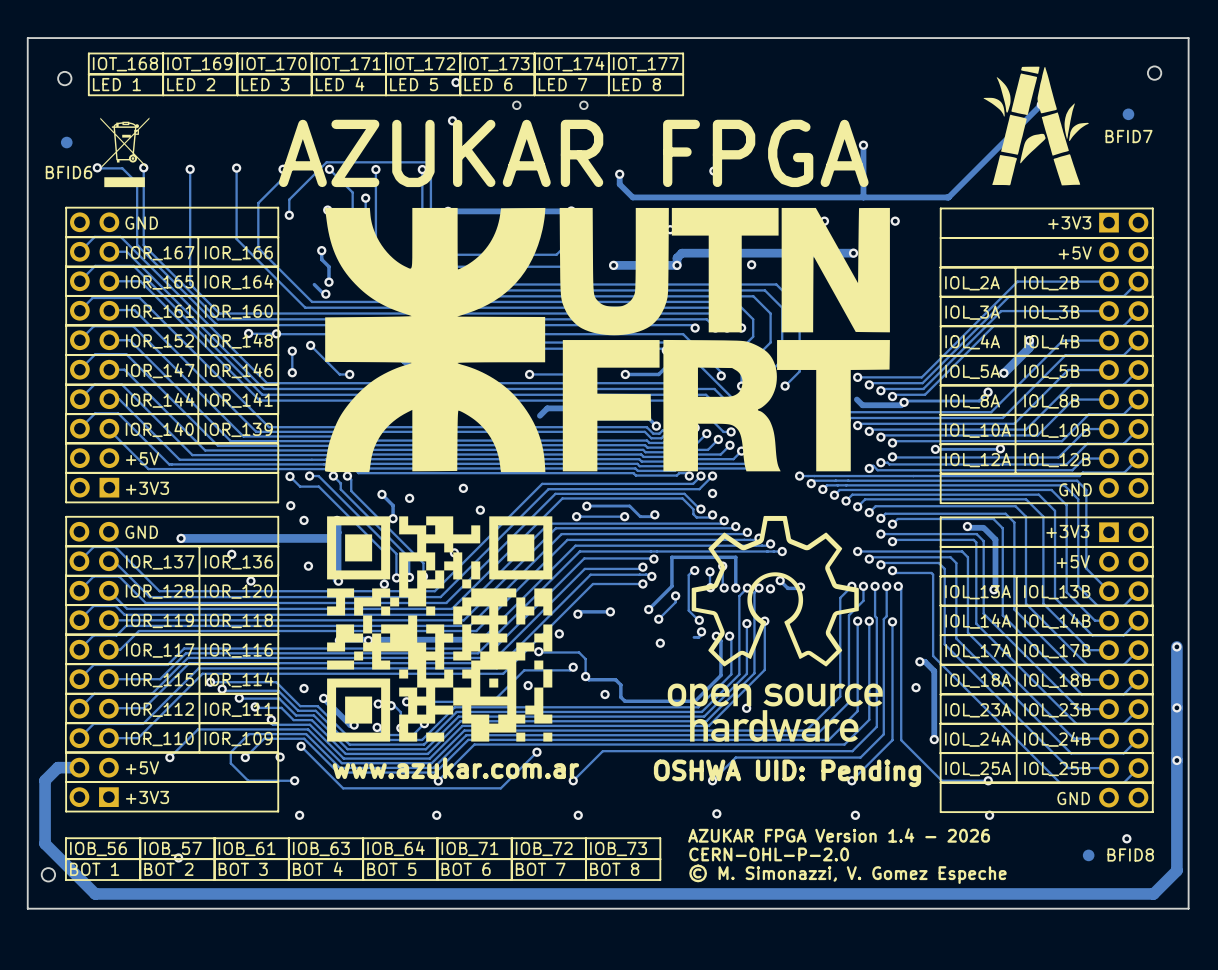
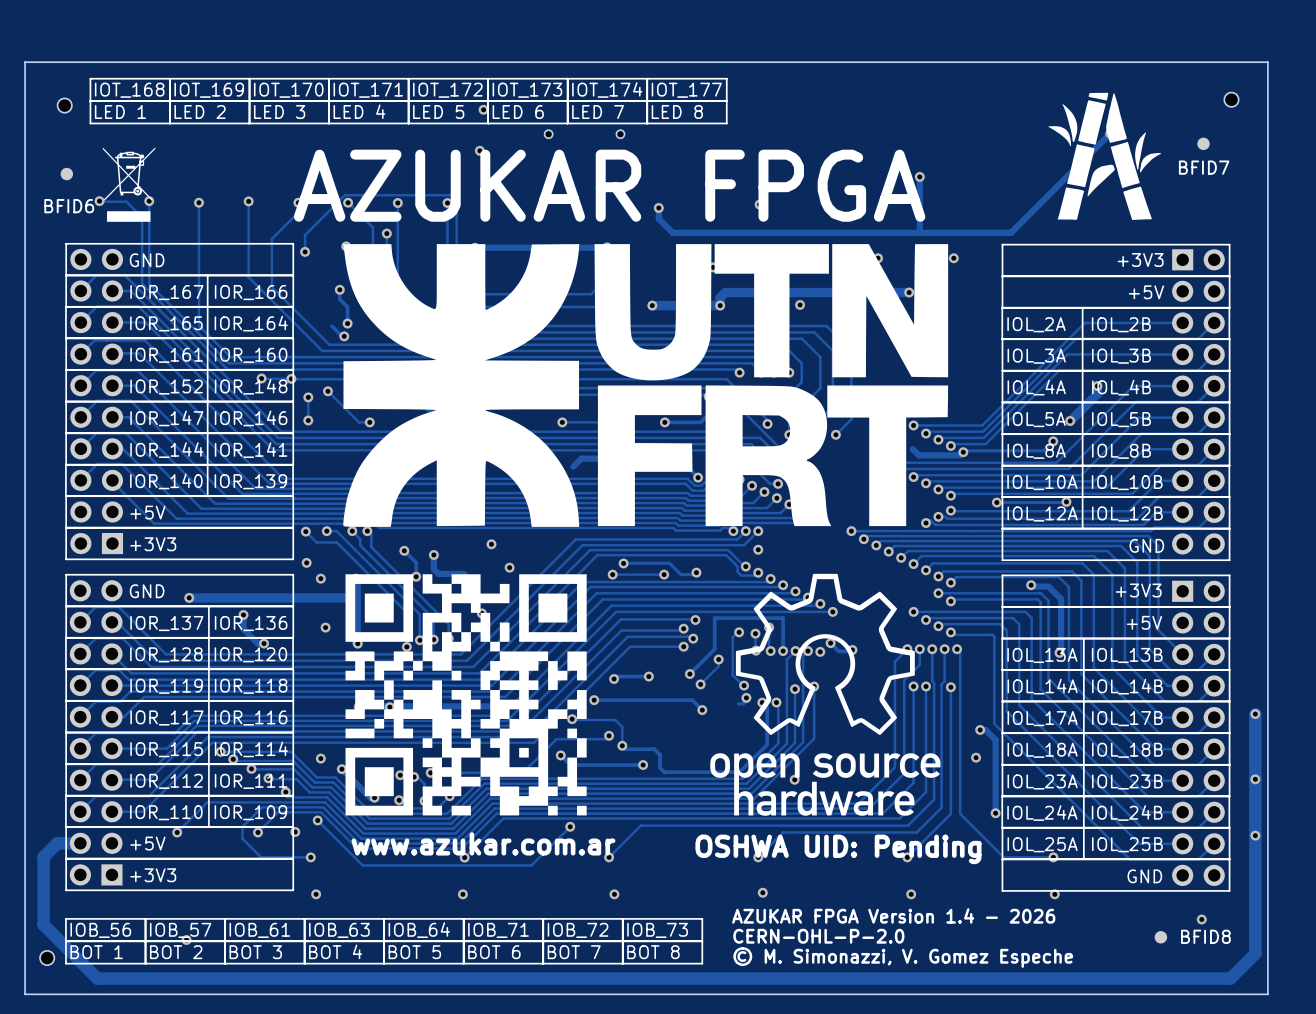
track: none -> (433, 554) (433, 569) (438, 573) (463, 573) (468, 578) (477, 578)
track: none -> (243, 614) (243, 629) (257, 643) (264, 643)
track: none -> (594, 700) (692, 700) (702, 710)
track: none -> (560, 755) (570, 765) (643, 765)

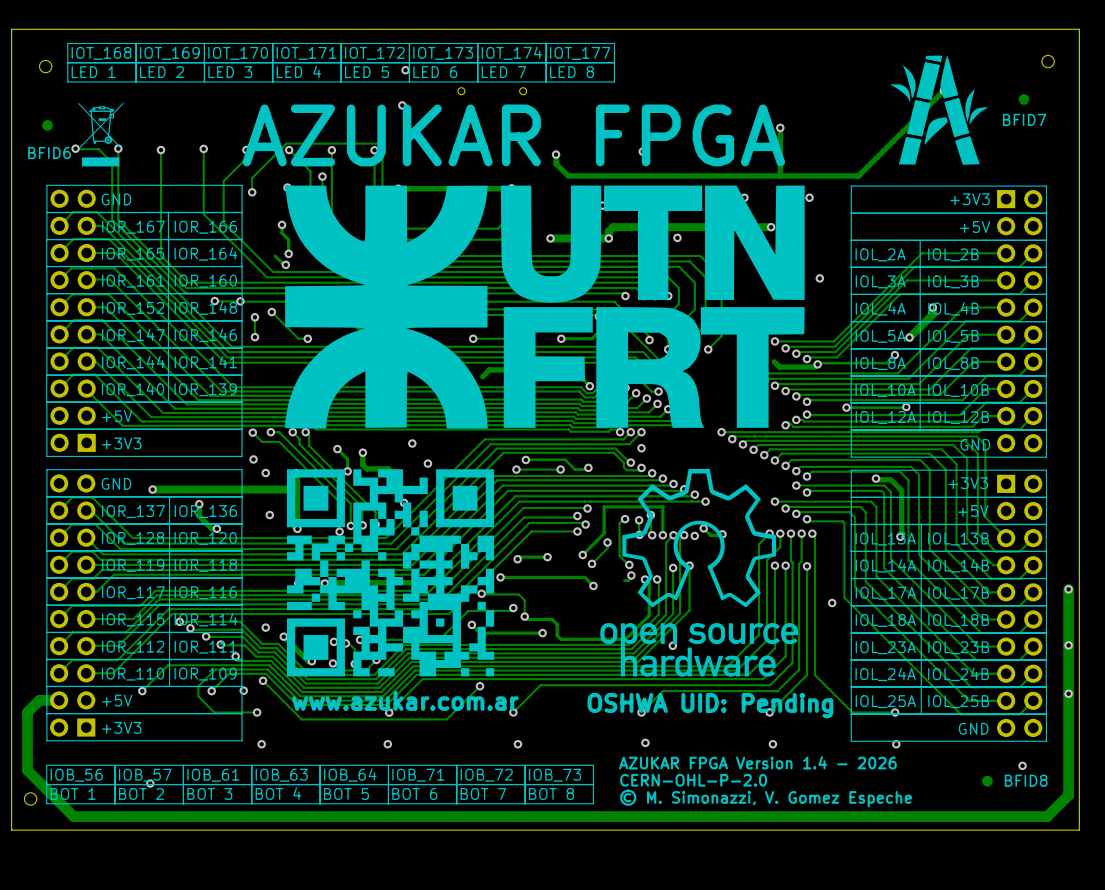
via: none -> (819, 278)
track: (980, 729) (985, 729) (995, 739) (995, 813) -> none
via: (976, 757) -> none
via: (995, 813) -> none

